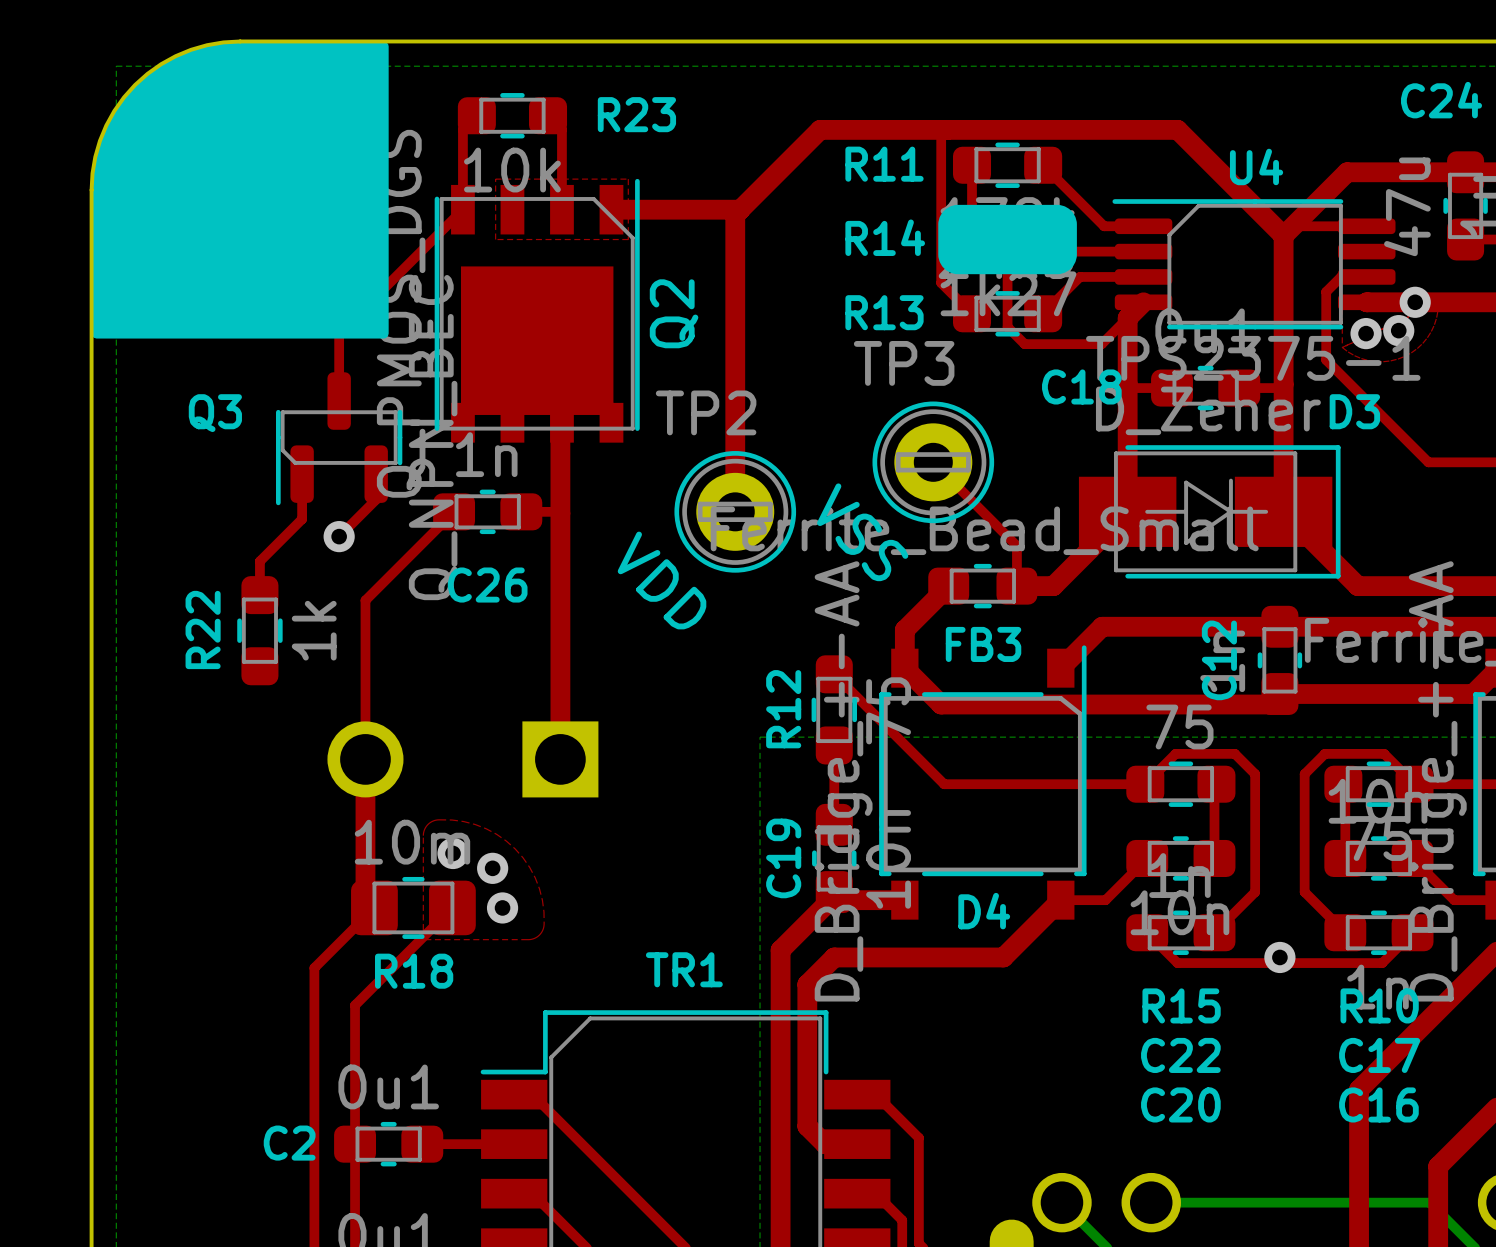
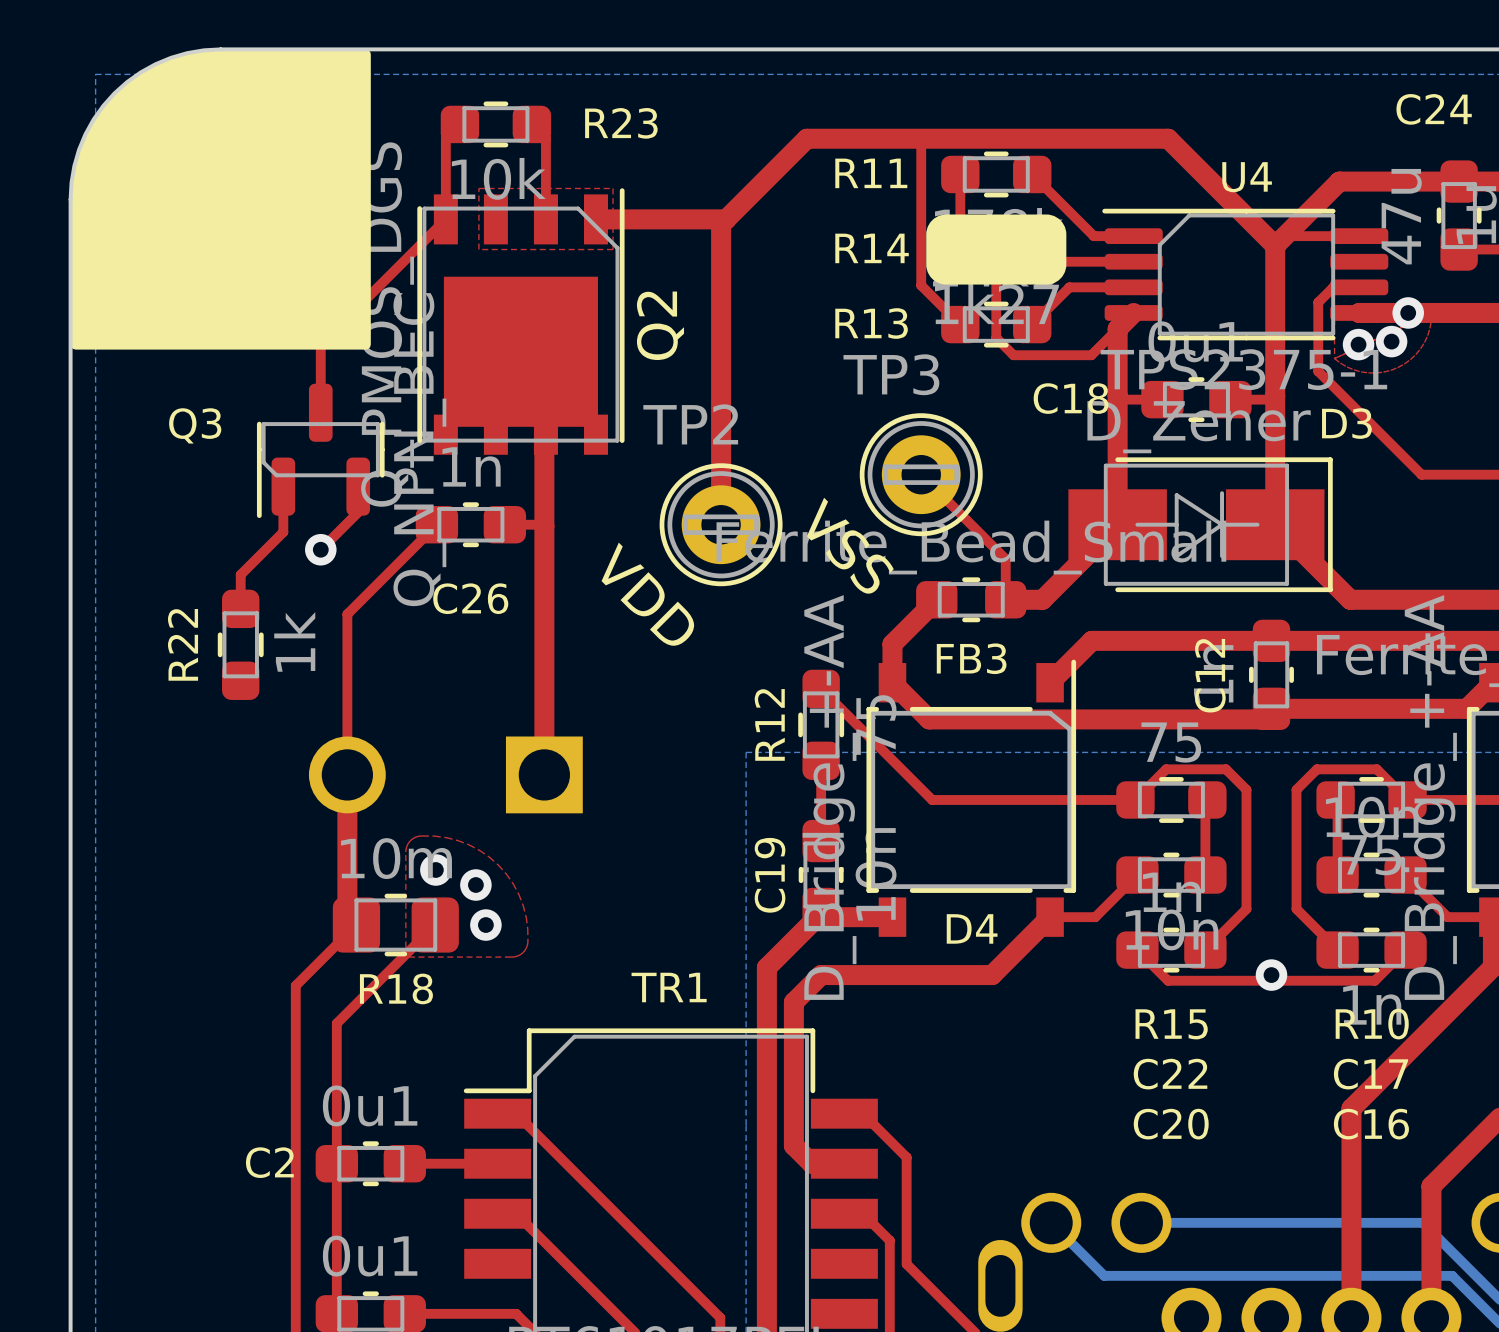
top track: (947, 129) (941, 136) (941, 282) -> (921, 134) (921, 285) (929, 293)

